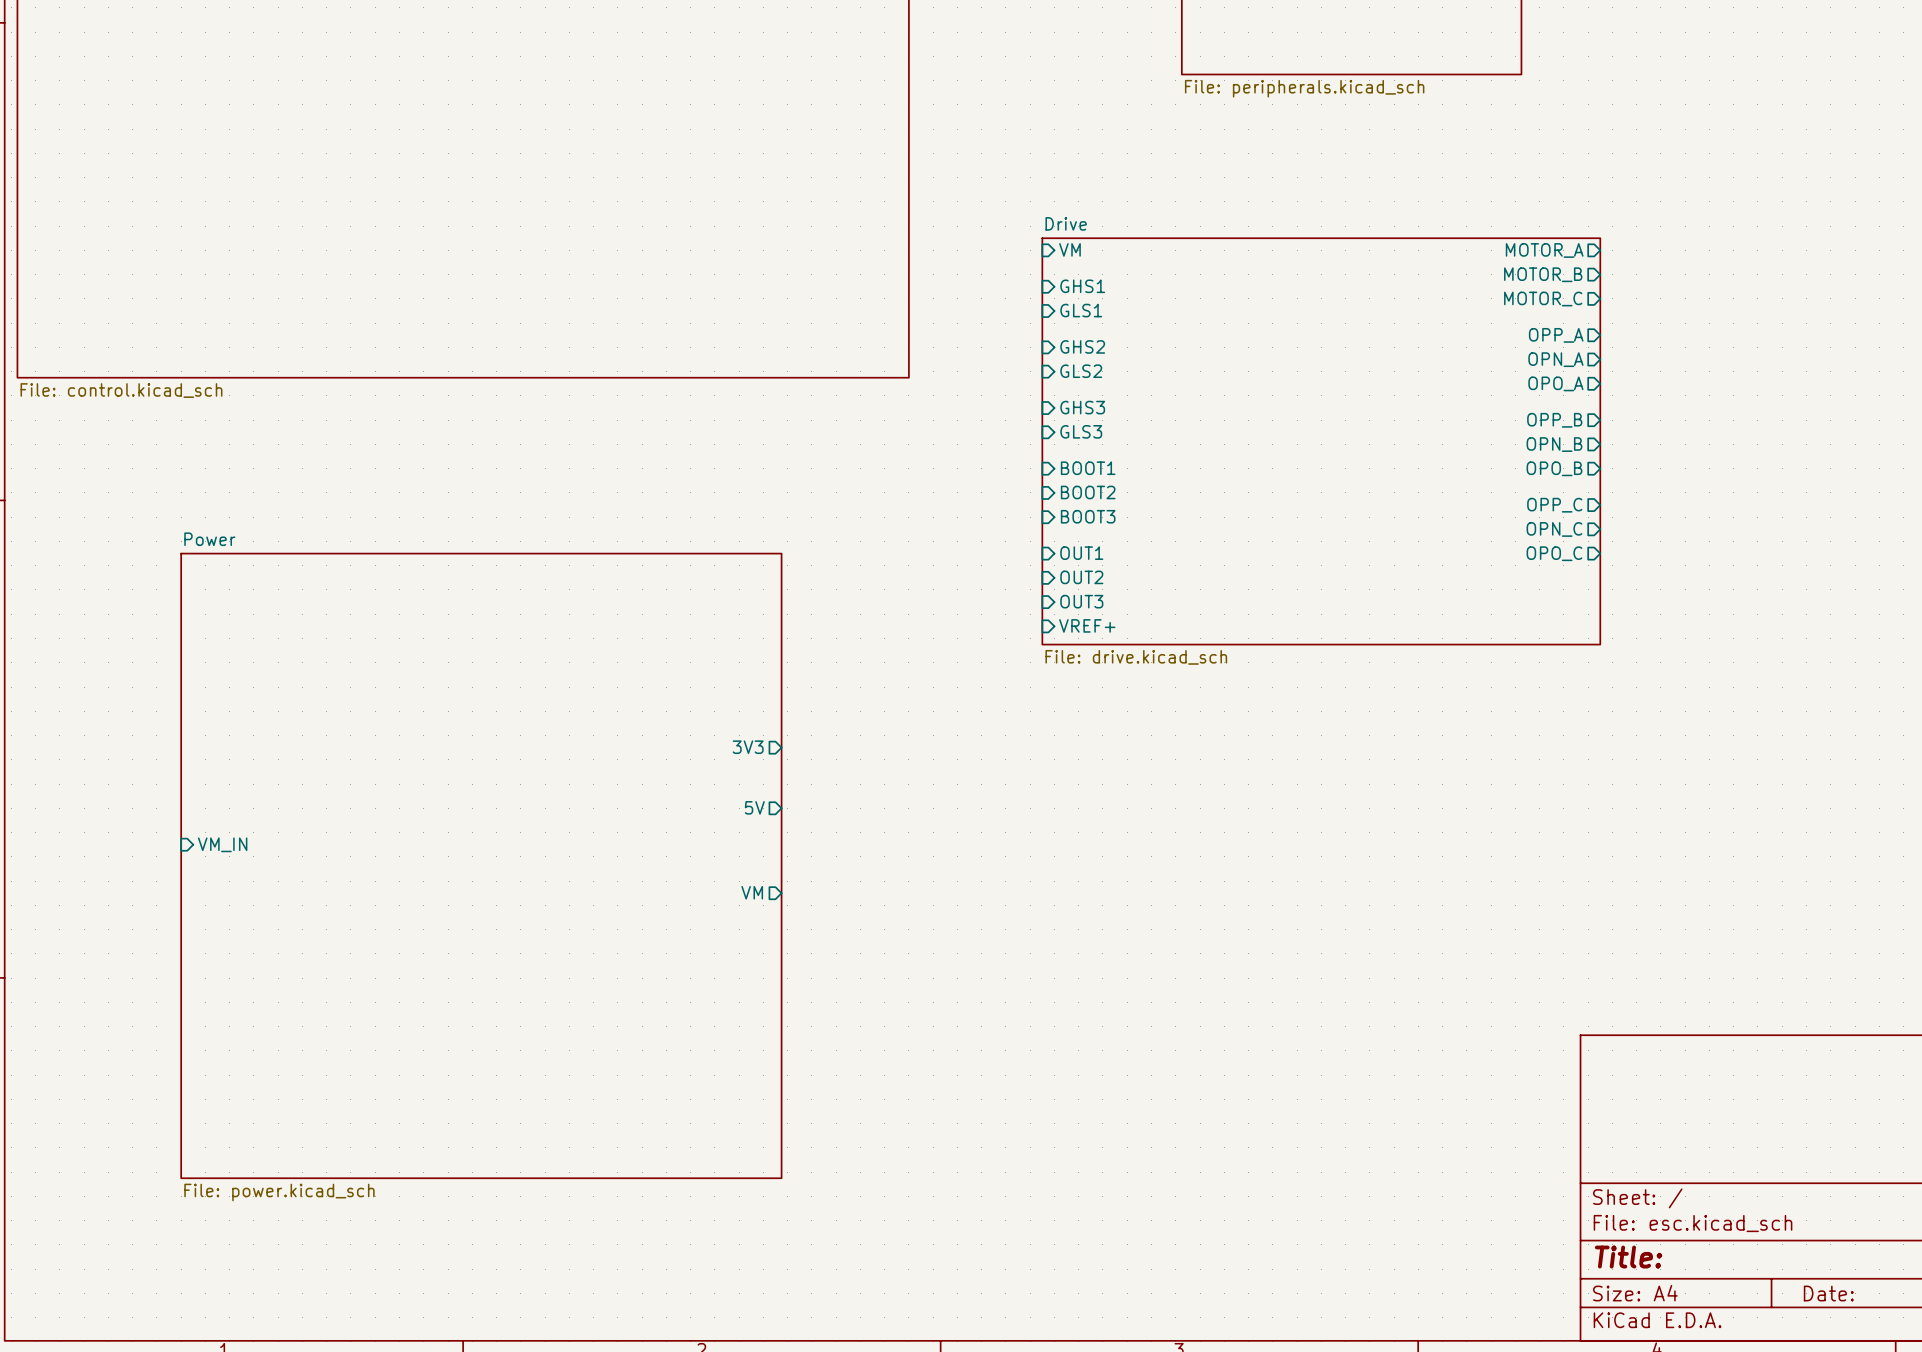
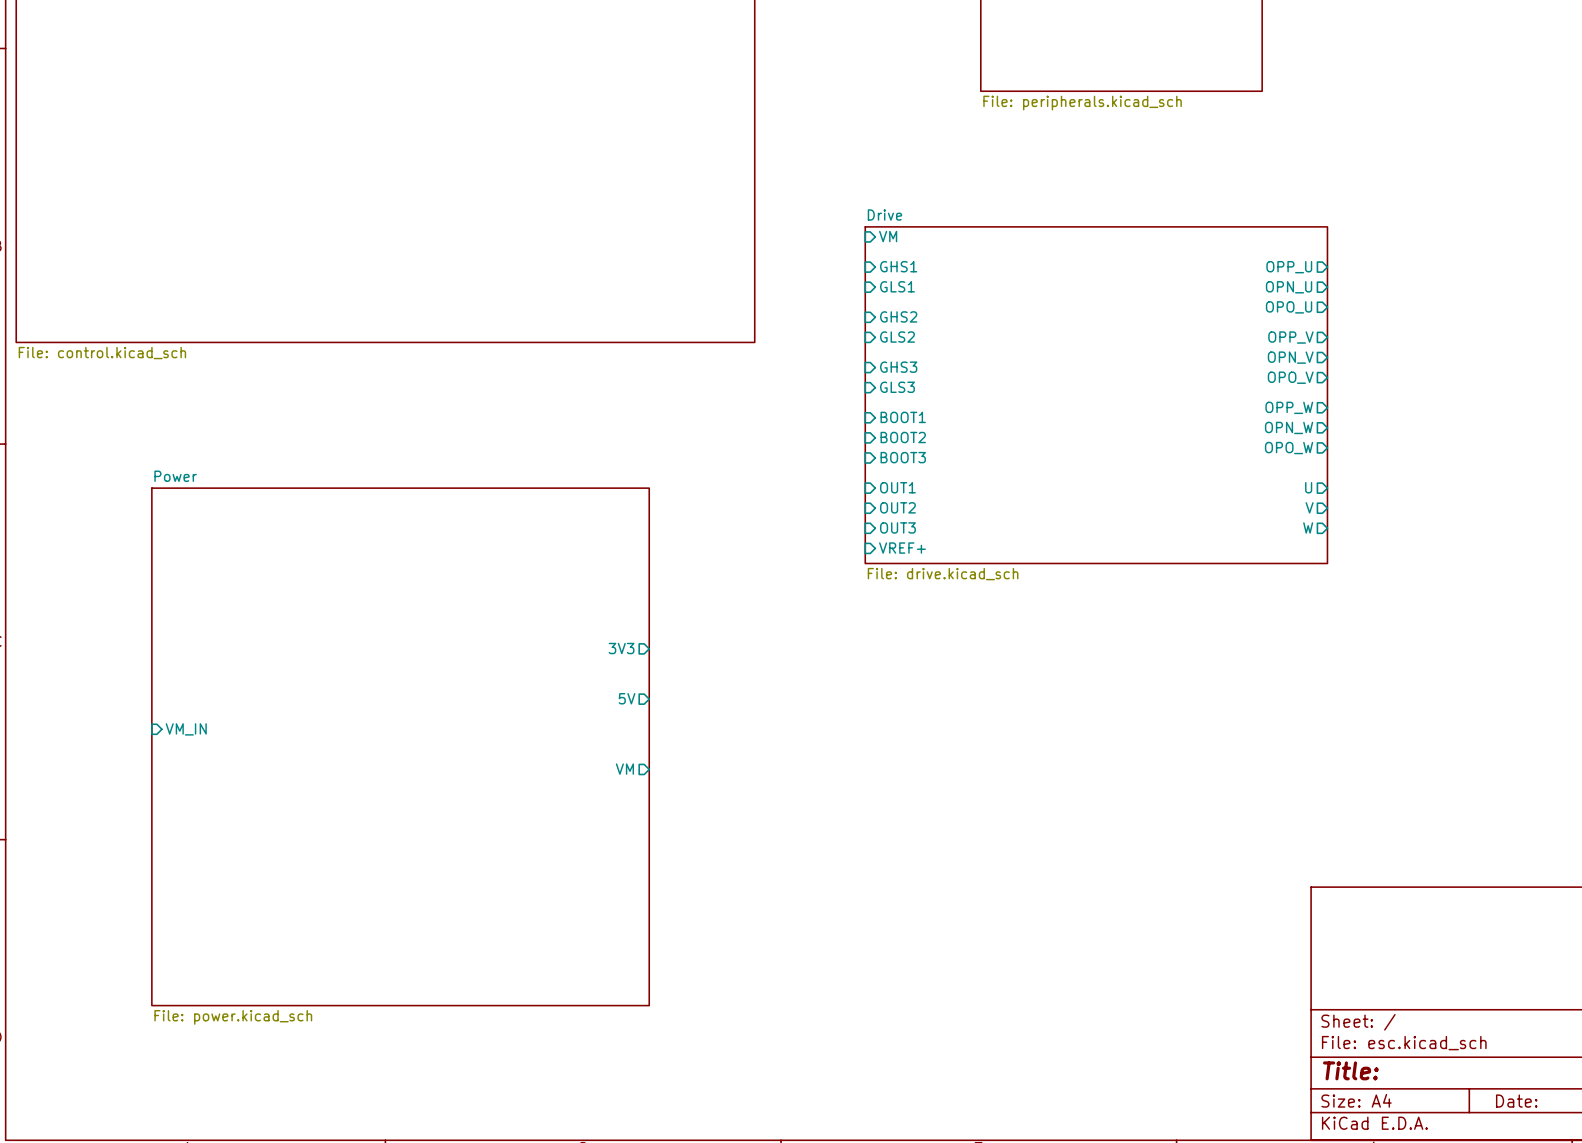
sheet pin: MOTOR_A (1544, 250) -> none
sheet pin: MOTOR_B (1543, 274) -> none
sheet pin: none -> OPP_U (1289, 267)
sheet pin: MOTOR_C (1543, 299) -> none
sheet pin: none -> OPN_U (1289, 287)
sheet pin: OPP_A (1556, 335) -> OPO_U (1289, 307)
sheet pin: OPN_A (1555, 359) -> none
sheet pin: none -> OPP_V (1290, 337)
sheet pin: OPO_A (1555, 383) -> none
sheet pin: none -> OPN_V (1290, 357)
sheet pin: OPP_B (1554, 420) -> OPO_V (1290, 377)
sheet pin: OPN_B (1554, 444) -> none
sheet pin: none -> OPP_W (1289, 407)
sheet pin: OPO_B (1554, 468) -> none
sheet pin: none -> OPN_W (1289, 427)
sheet pin: OPP_C (1554, 505) -> OPO_W (1289, 448)
sheet pin: OPN_C (1554, 529) -> none
sheet pin: OPO_C (1554, 553) -> U (1308, 487)
sheet pin: none -> V (1309, 507)
sheet pin: none -> W (1308, 527)

